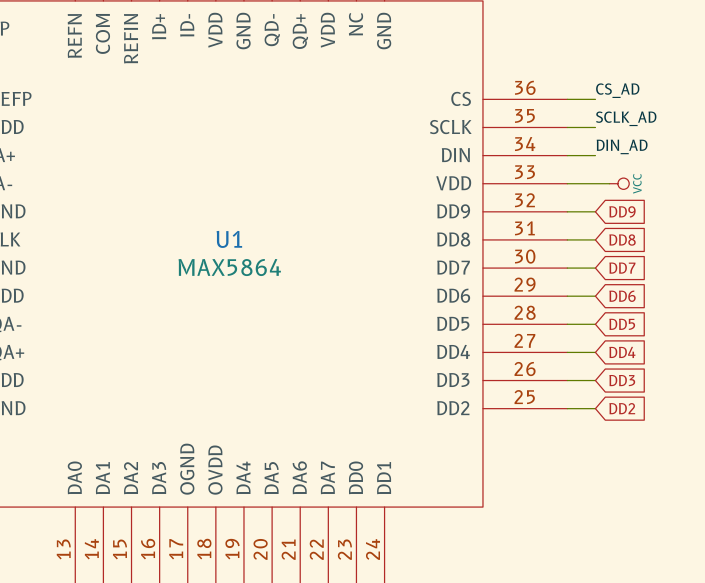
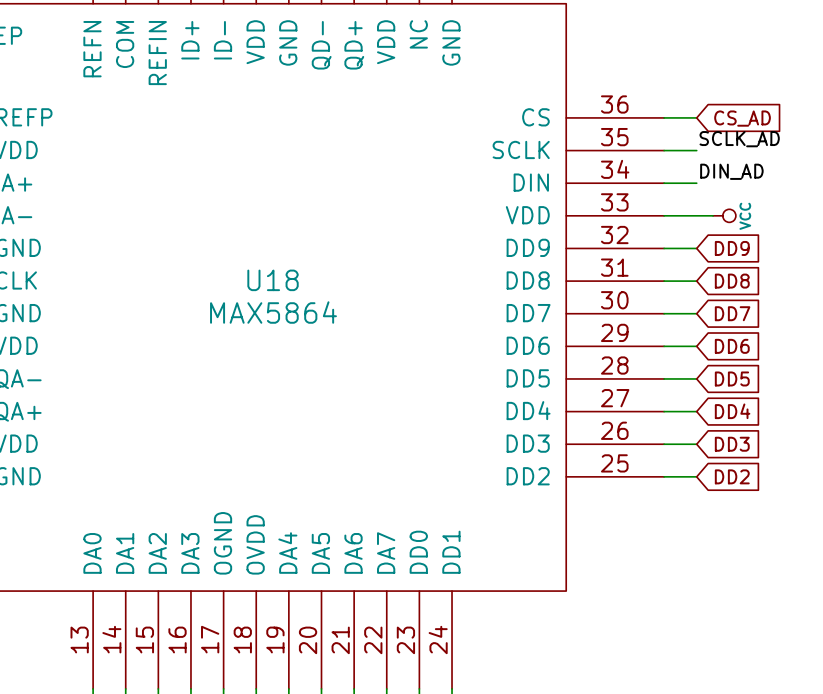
label: CS_AD (617, 90) -> none
global label: none -> CS_AD (742, 118)
U1 name: U1 (229, 239) -> U18 (273, 280)

